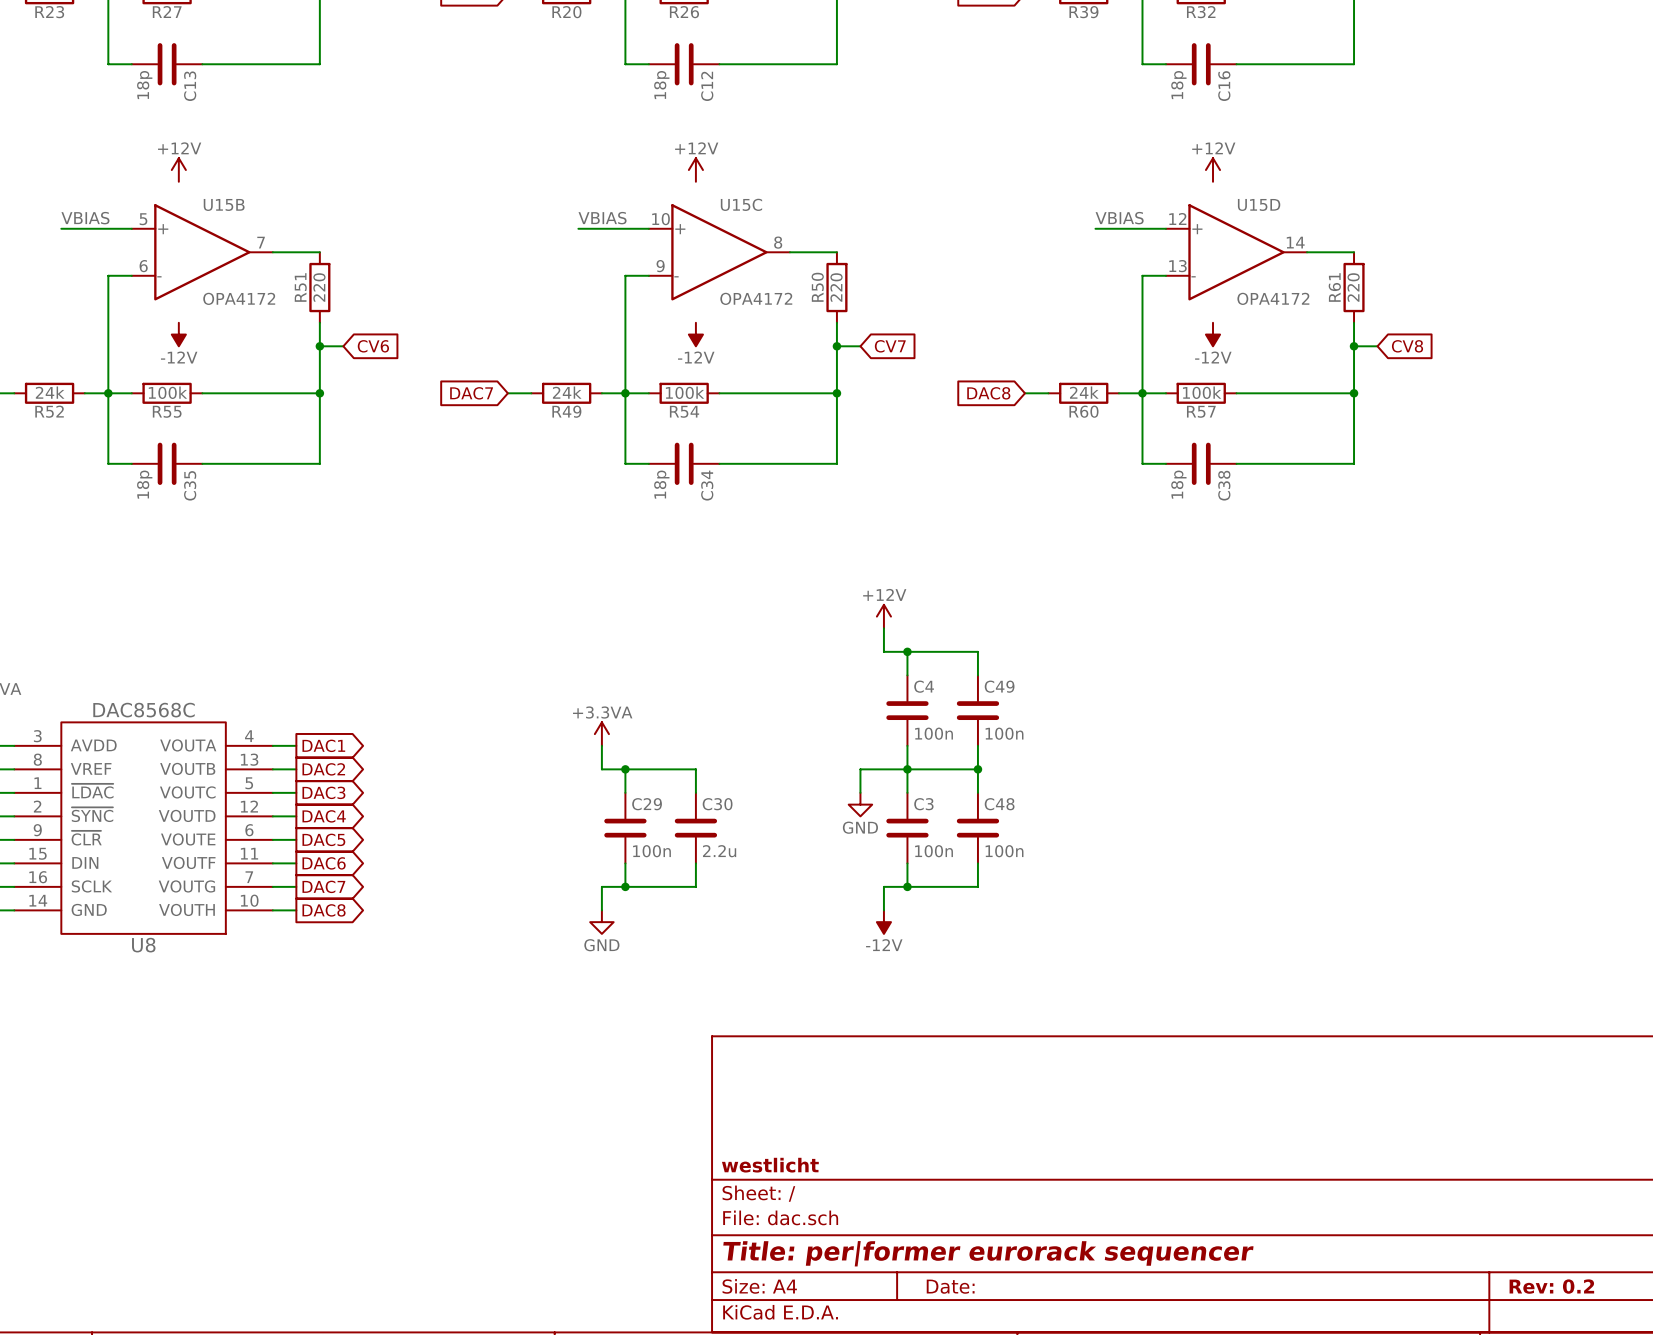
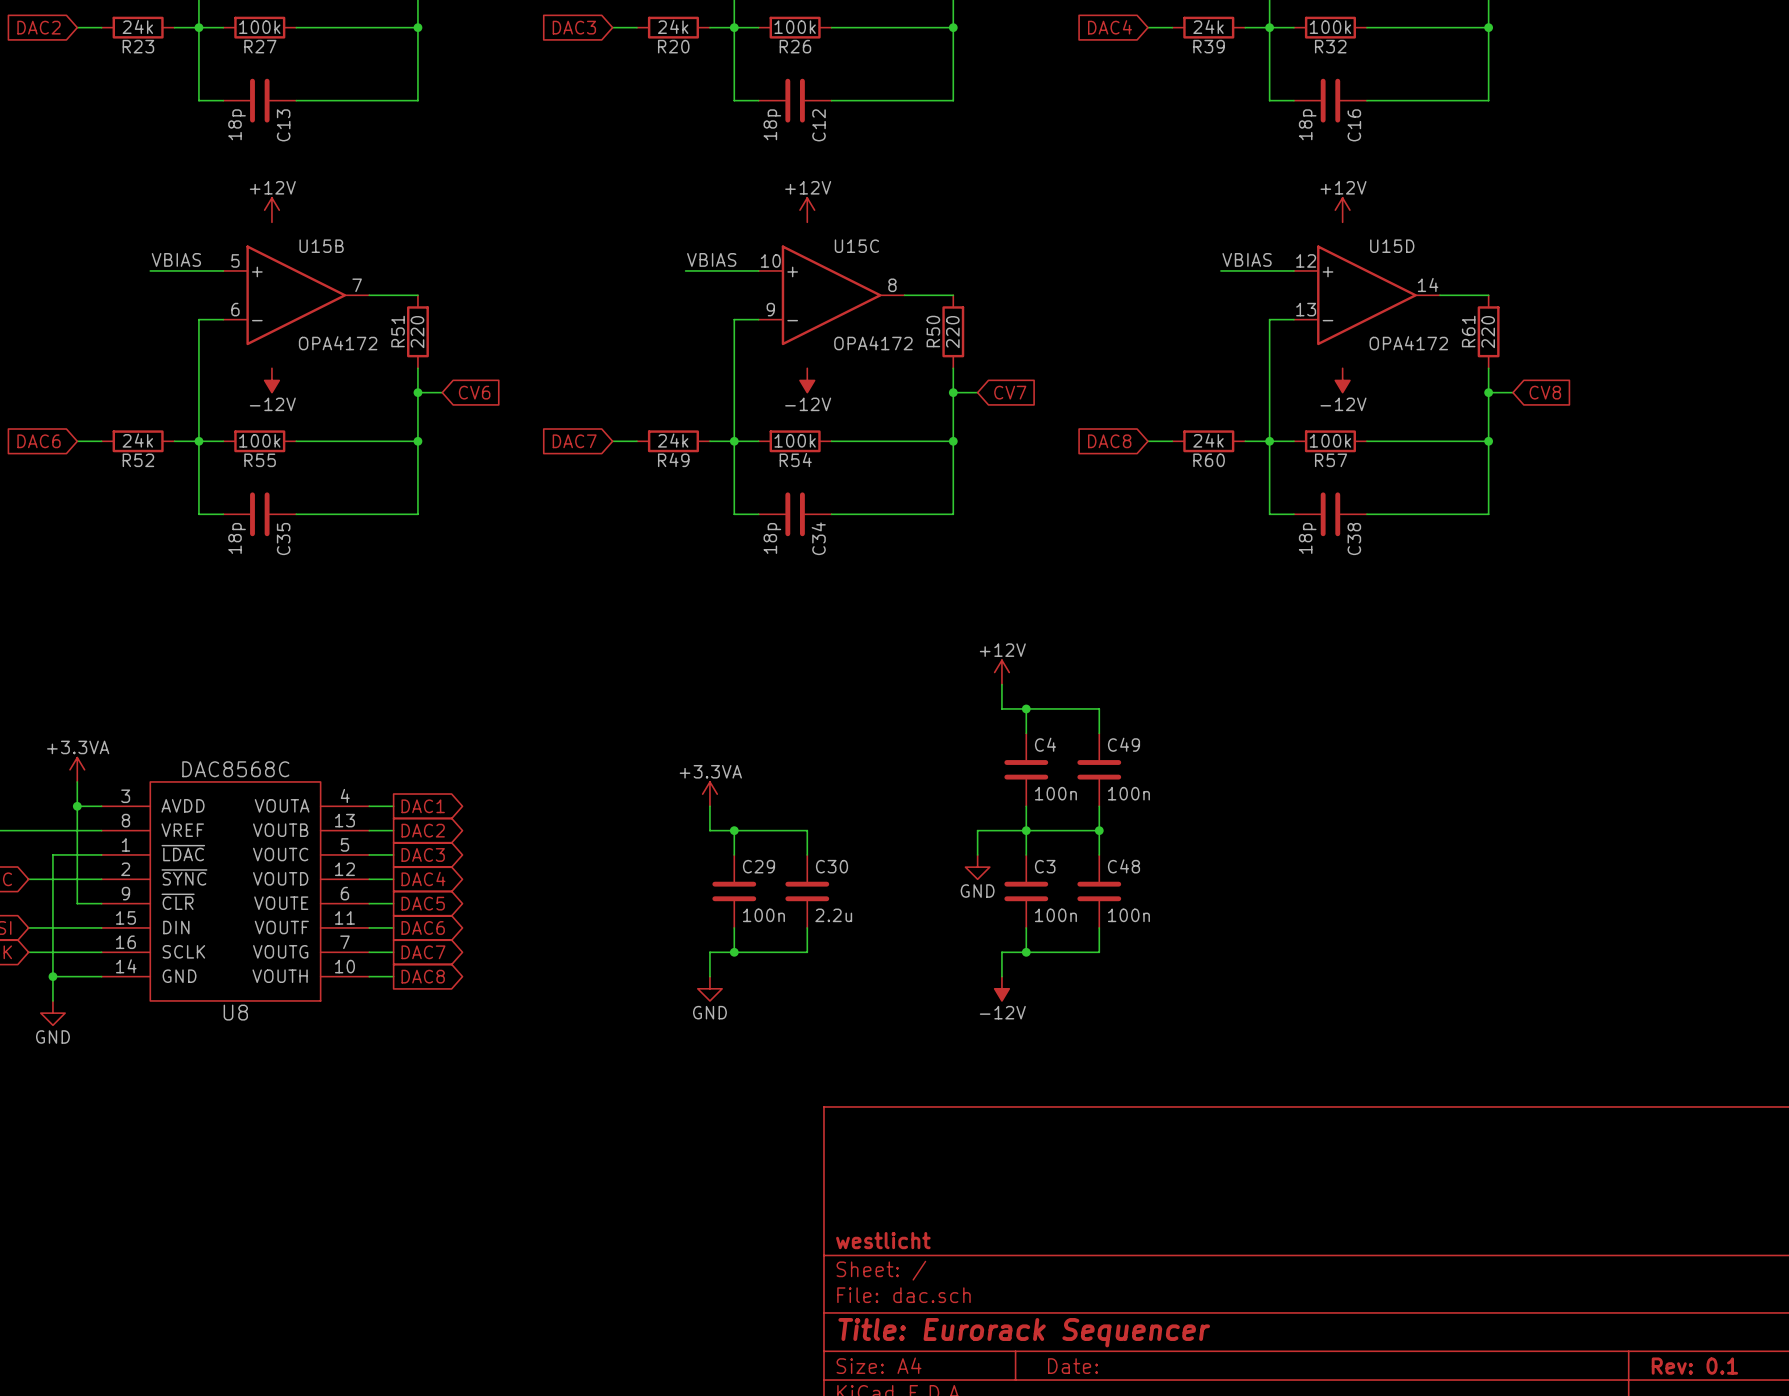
title block: Title: per|former eurorack sequencer (988, 1253) -> Title: Eurorack Sequencer (1024, 1332)
title block: Rev: 0.2 (1551, 1286) -> Rev: 0.1 (1694, 1366)

